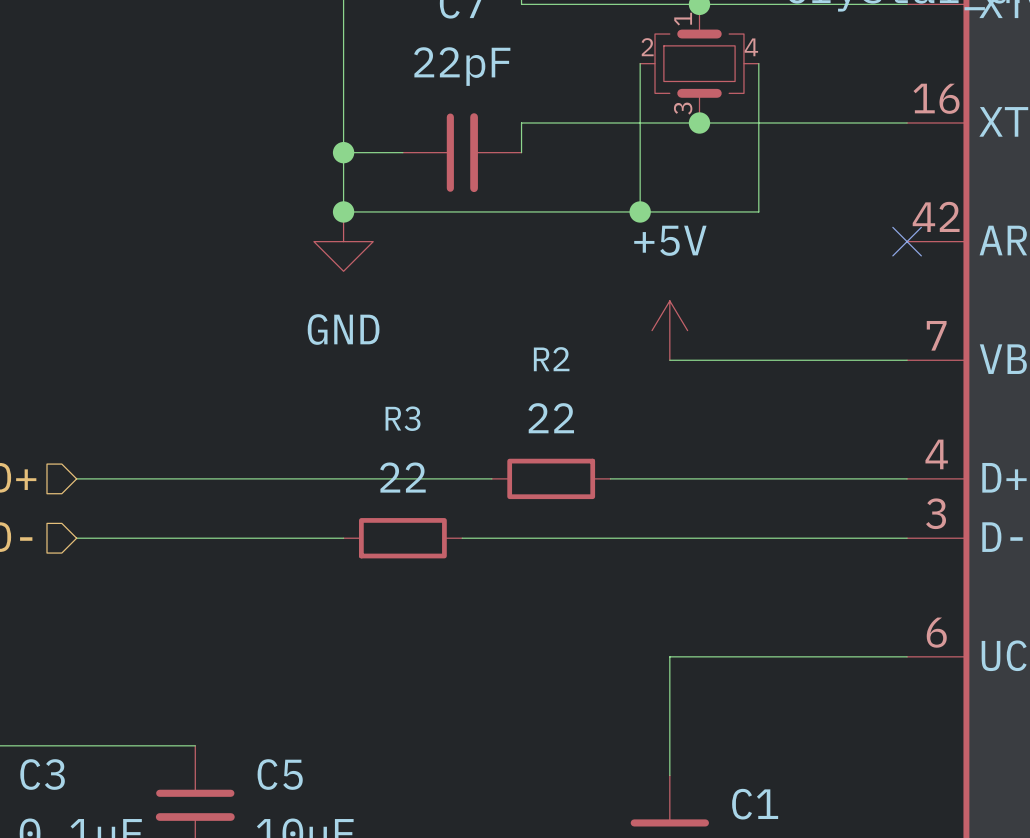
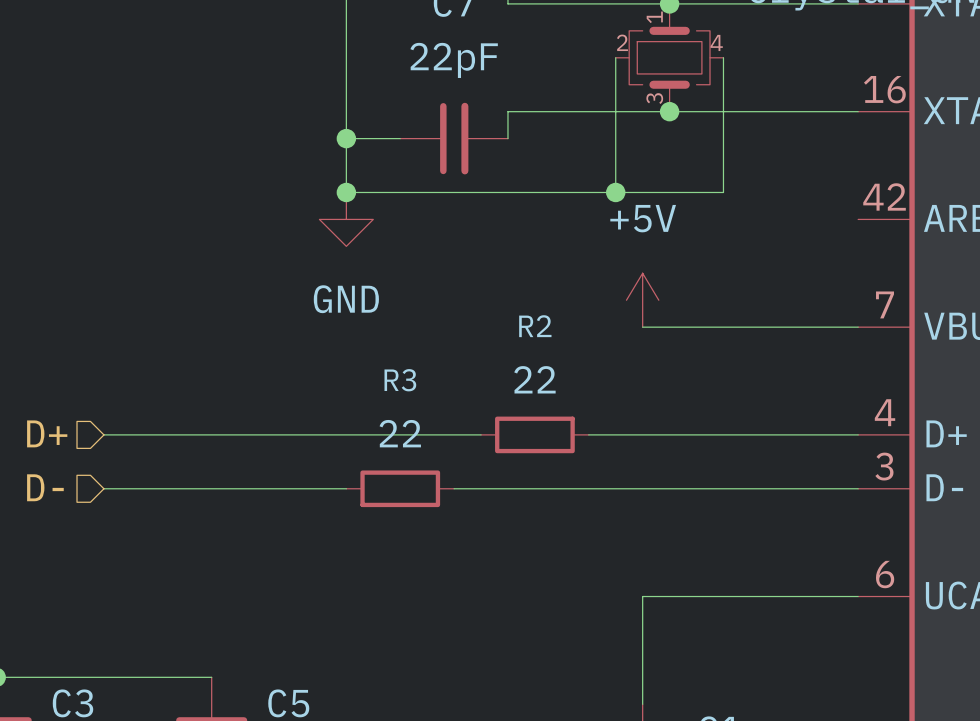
no-connect mark: (907, 241) -> none

